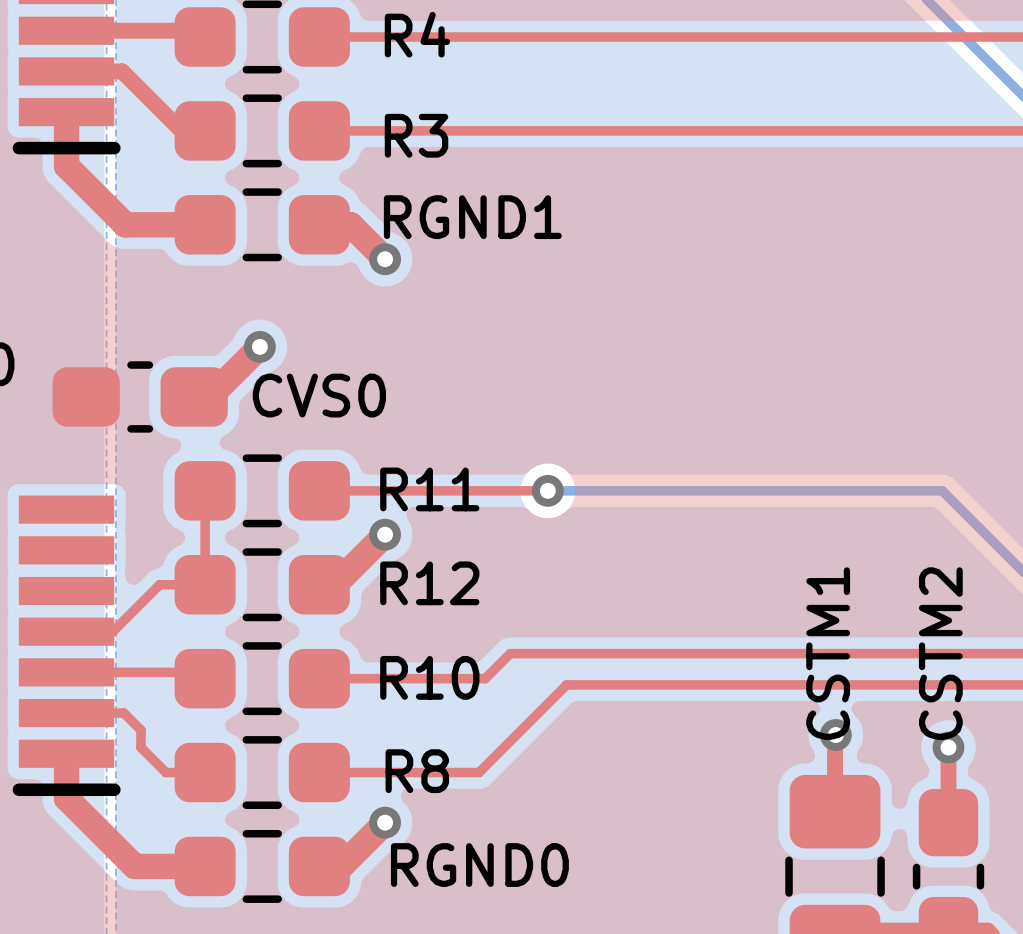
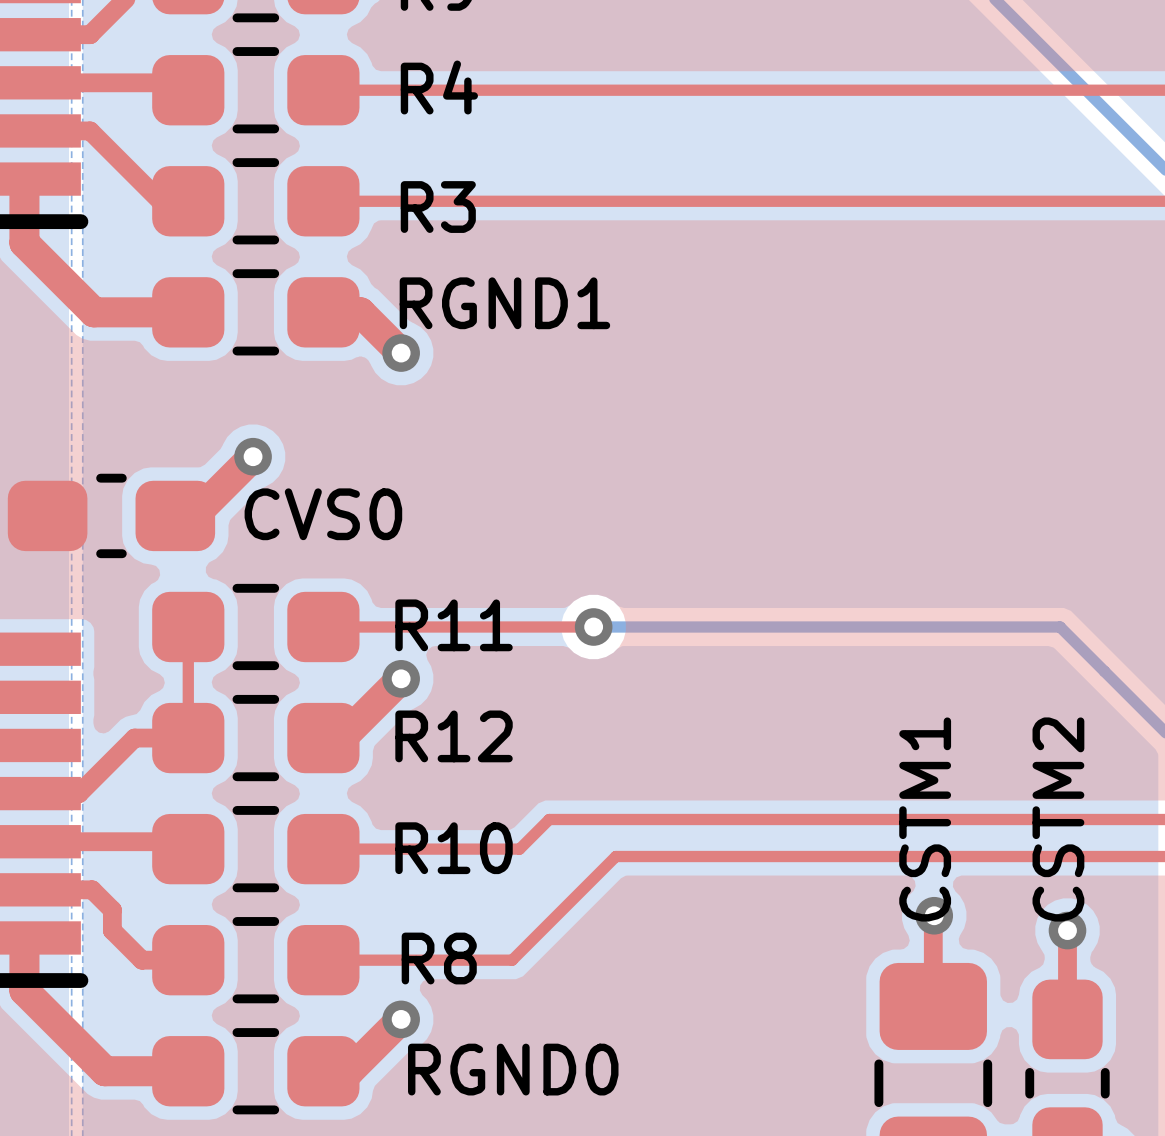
top track width: thin (205, 584) (159, 584) (112, 631) (66, 631) -> thick (188, 738) (134, 738) (79, 793) (24, 793)
top track width: thin (66, 672) (198, 672) -> thick (24, 841) (180, 841)
top track width: thin (66, 713) (123, 713) (140, 730) (140, 747) (166, 772) (205, 772) -> thick (24, 889) (92, 889) (112, 910) (112, 930) (142, 960) (188, 960)

